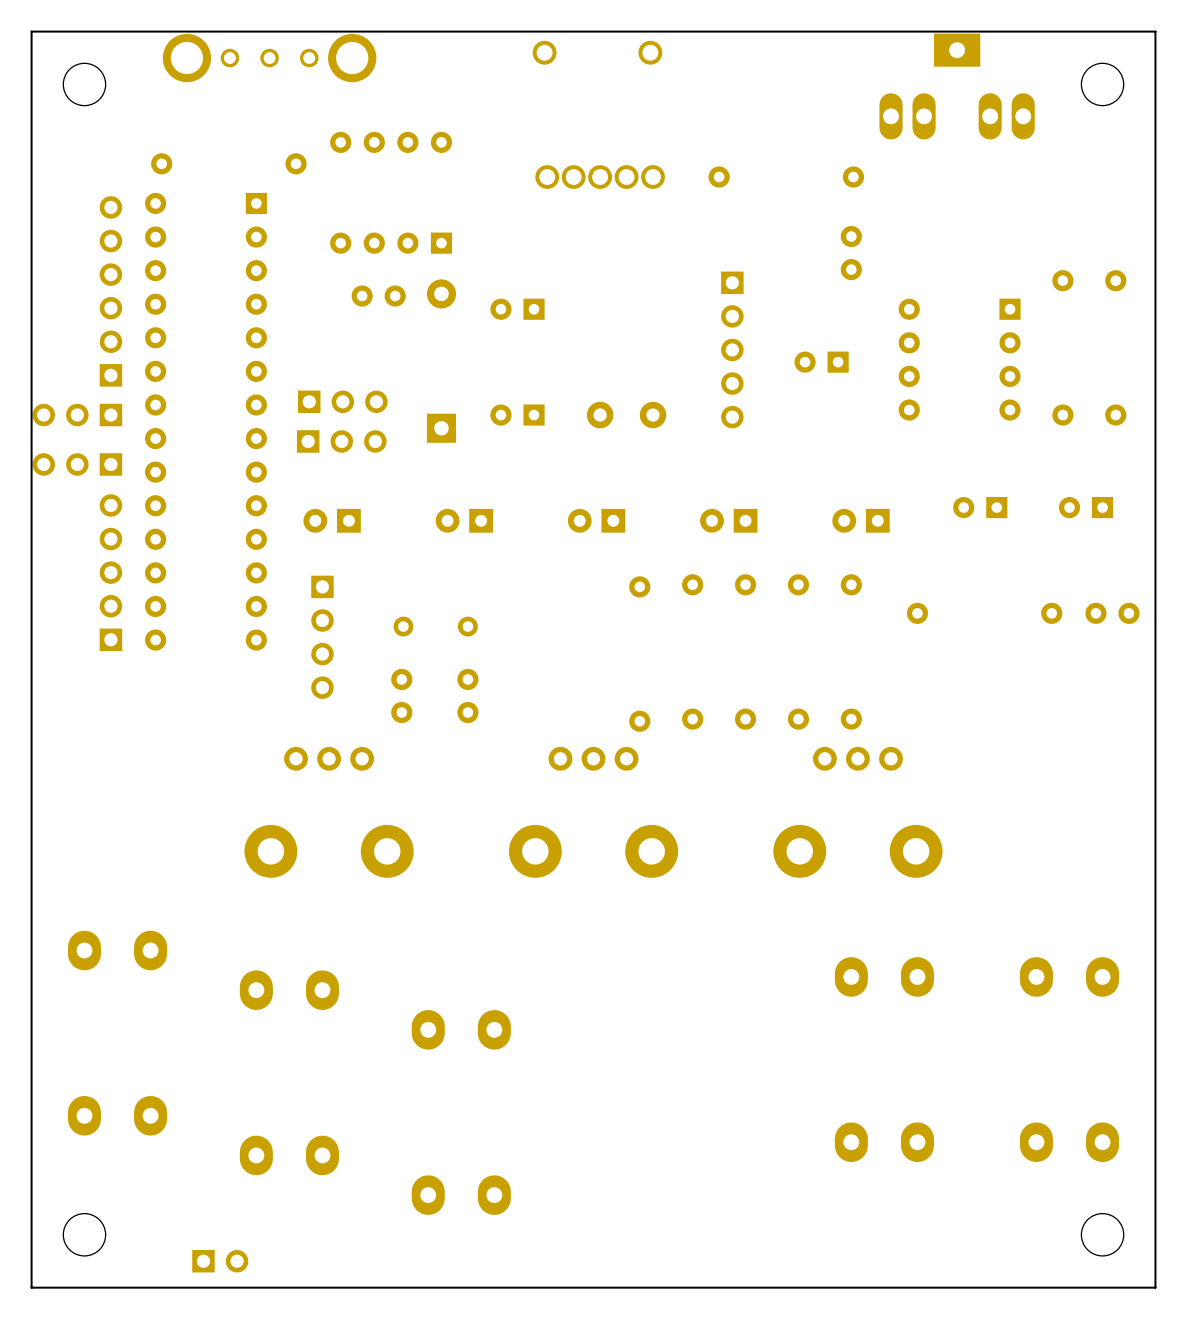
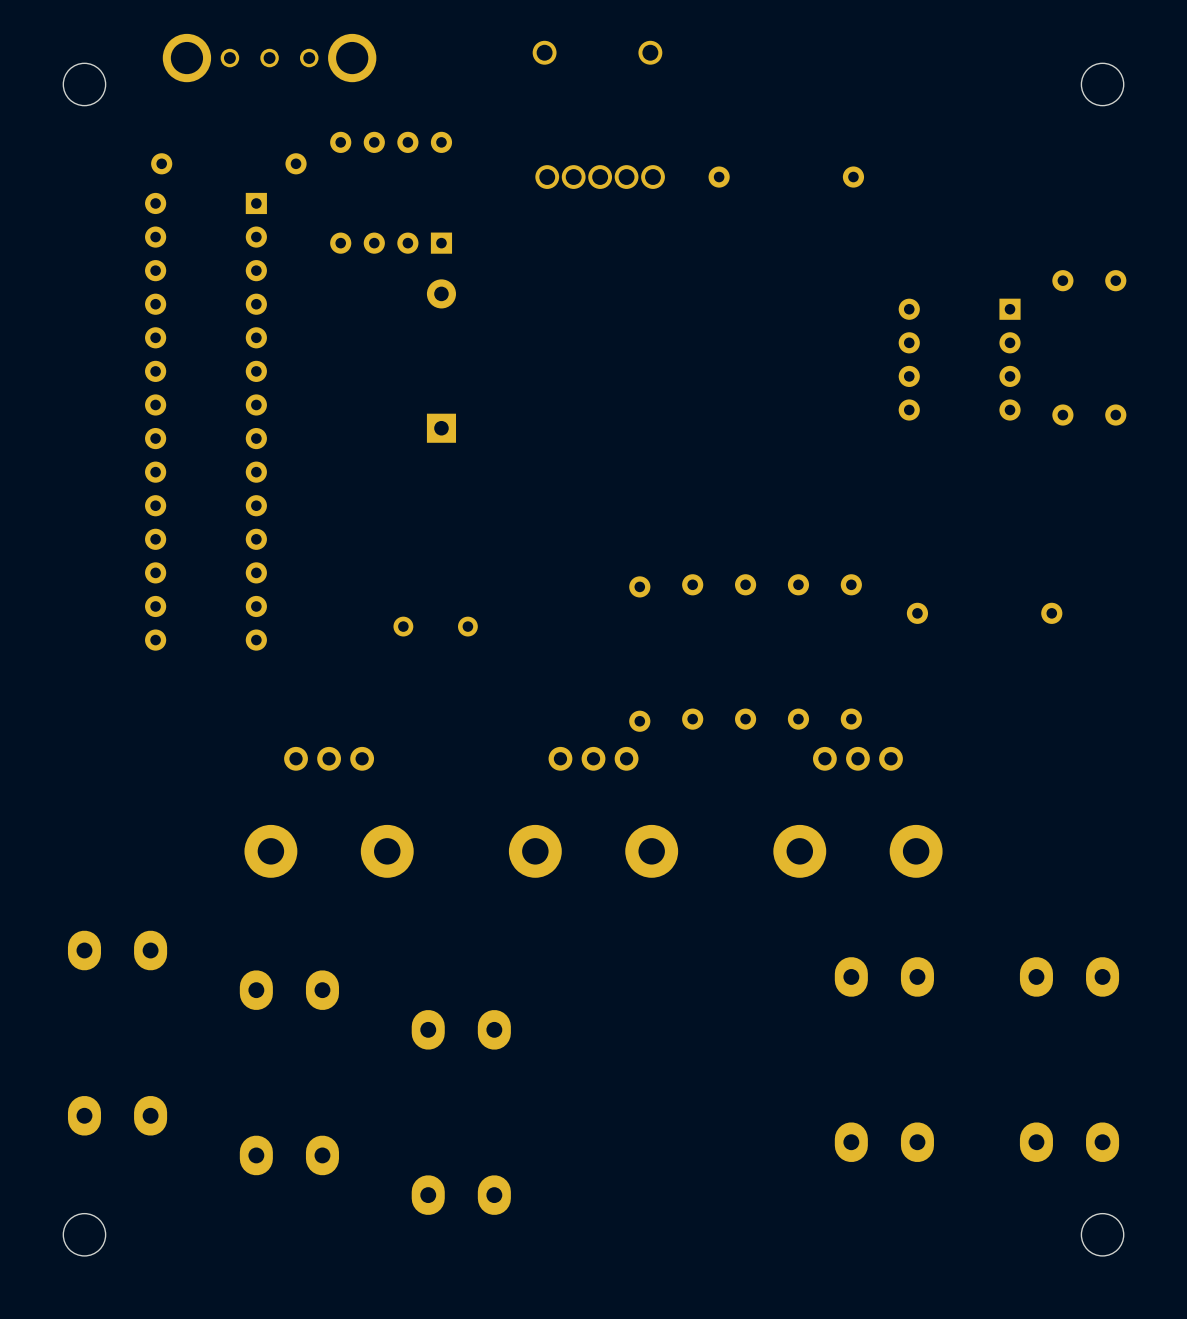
board edge: (1155, 31) (1155, 1287) (31, 1287) (31, 31) (1155, 31) -> none
part: (957, 86) -> none
part: (851, 253) -> none
part: (110, 291) -> none
part: (378, 296) -> none
part: (517, 309) -> none
part: (732, 349) -> none
part: (821, 362) -> none
part: (342, 401) -> none
part: (77, 415) -> none
part: (517, 415) -> none
part: (626, 415) -> none
part: (341, 441) -> none
part: (77, 464) -> none
part: (980, 507) -> none
part: (1086, 507) -> none
part: (332, 520) -> none
part: (464, 520) -> none
part: (596, 520) -> none
part: (728, 520) -> none
part: (860, 520) -> none
part: (110, 572) -> none
part: (1112, 613) -> none
part: (322, 637) -> none
part: (401, 695) -> none
part: (467, 695) -> none
part: (220, 1261) -> none

